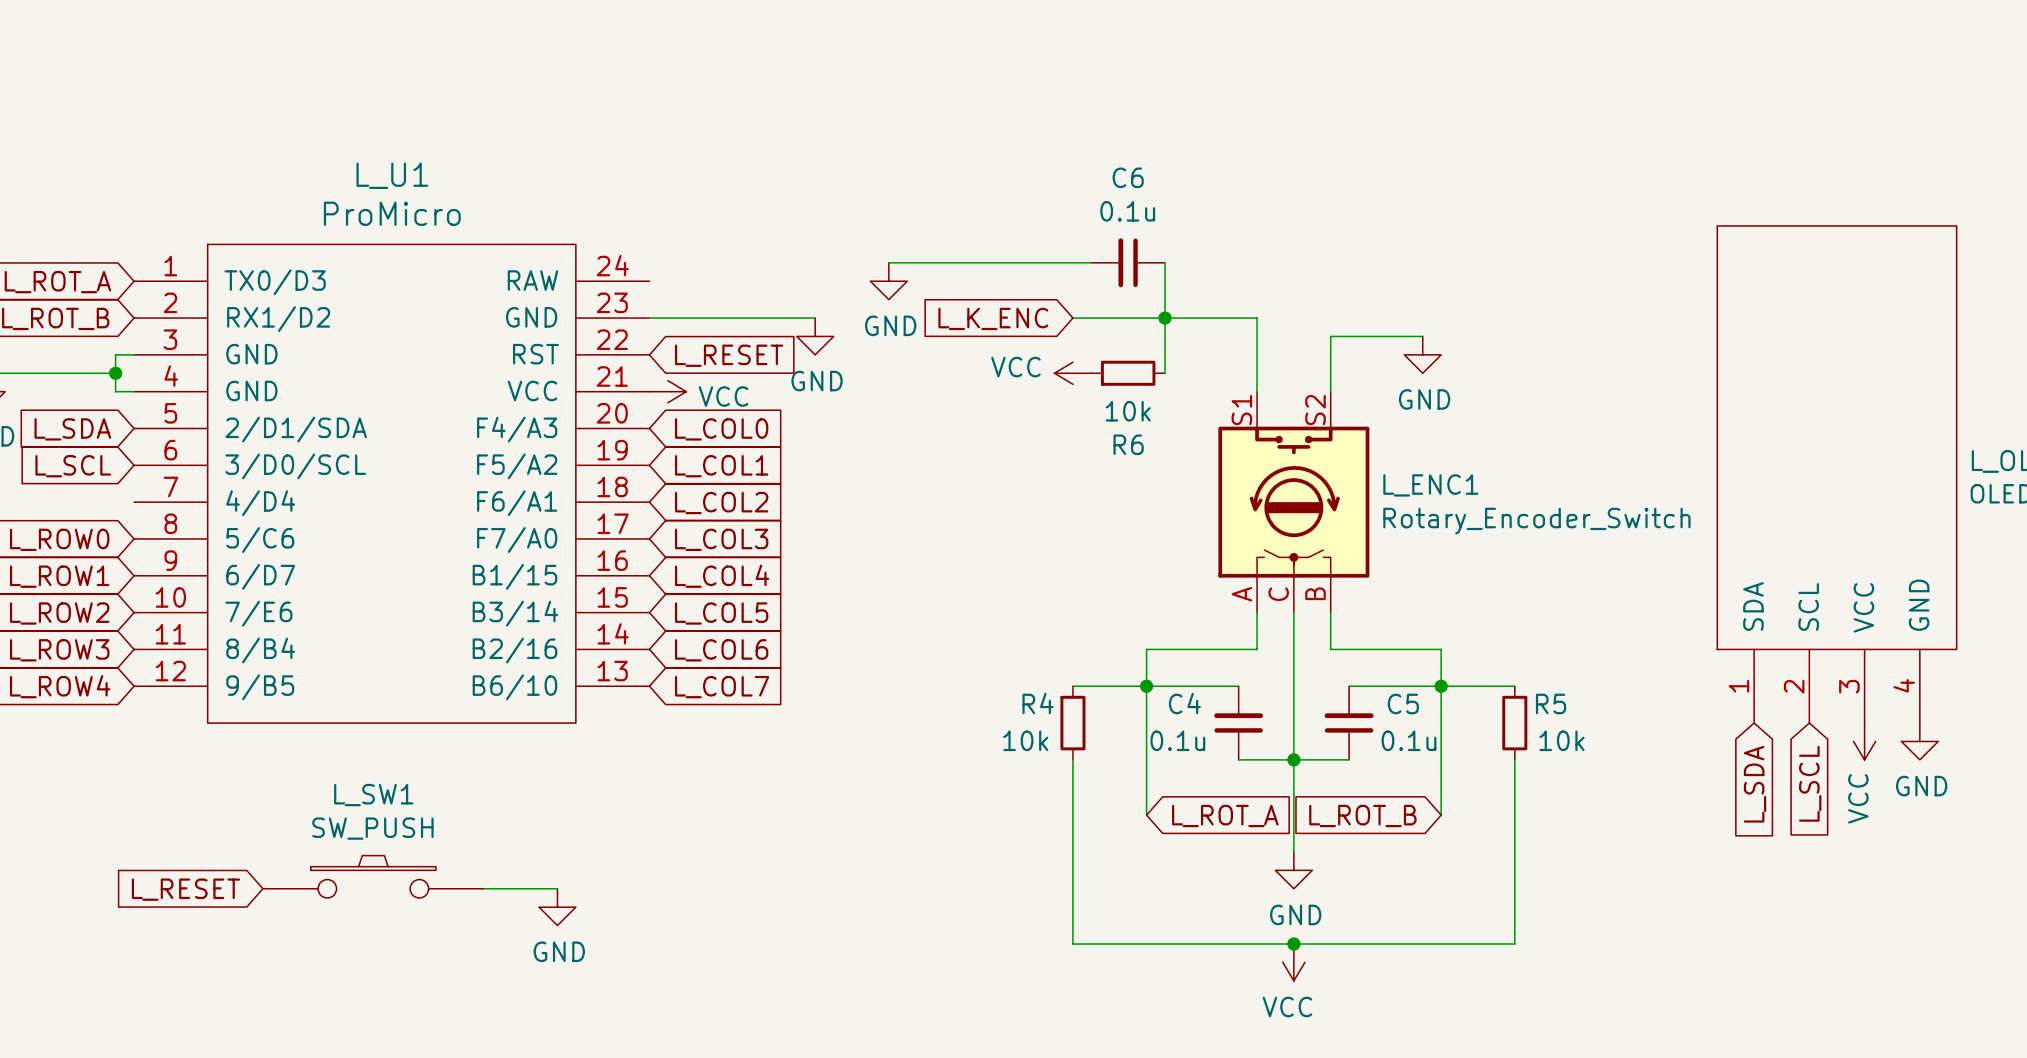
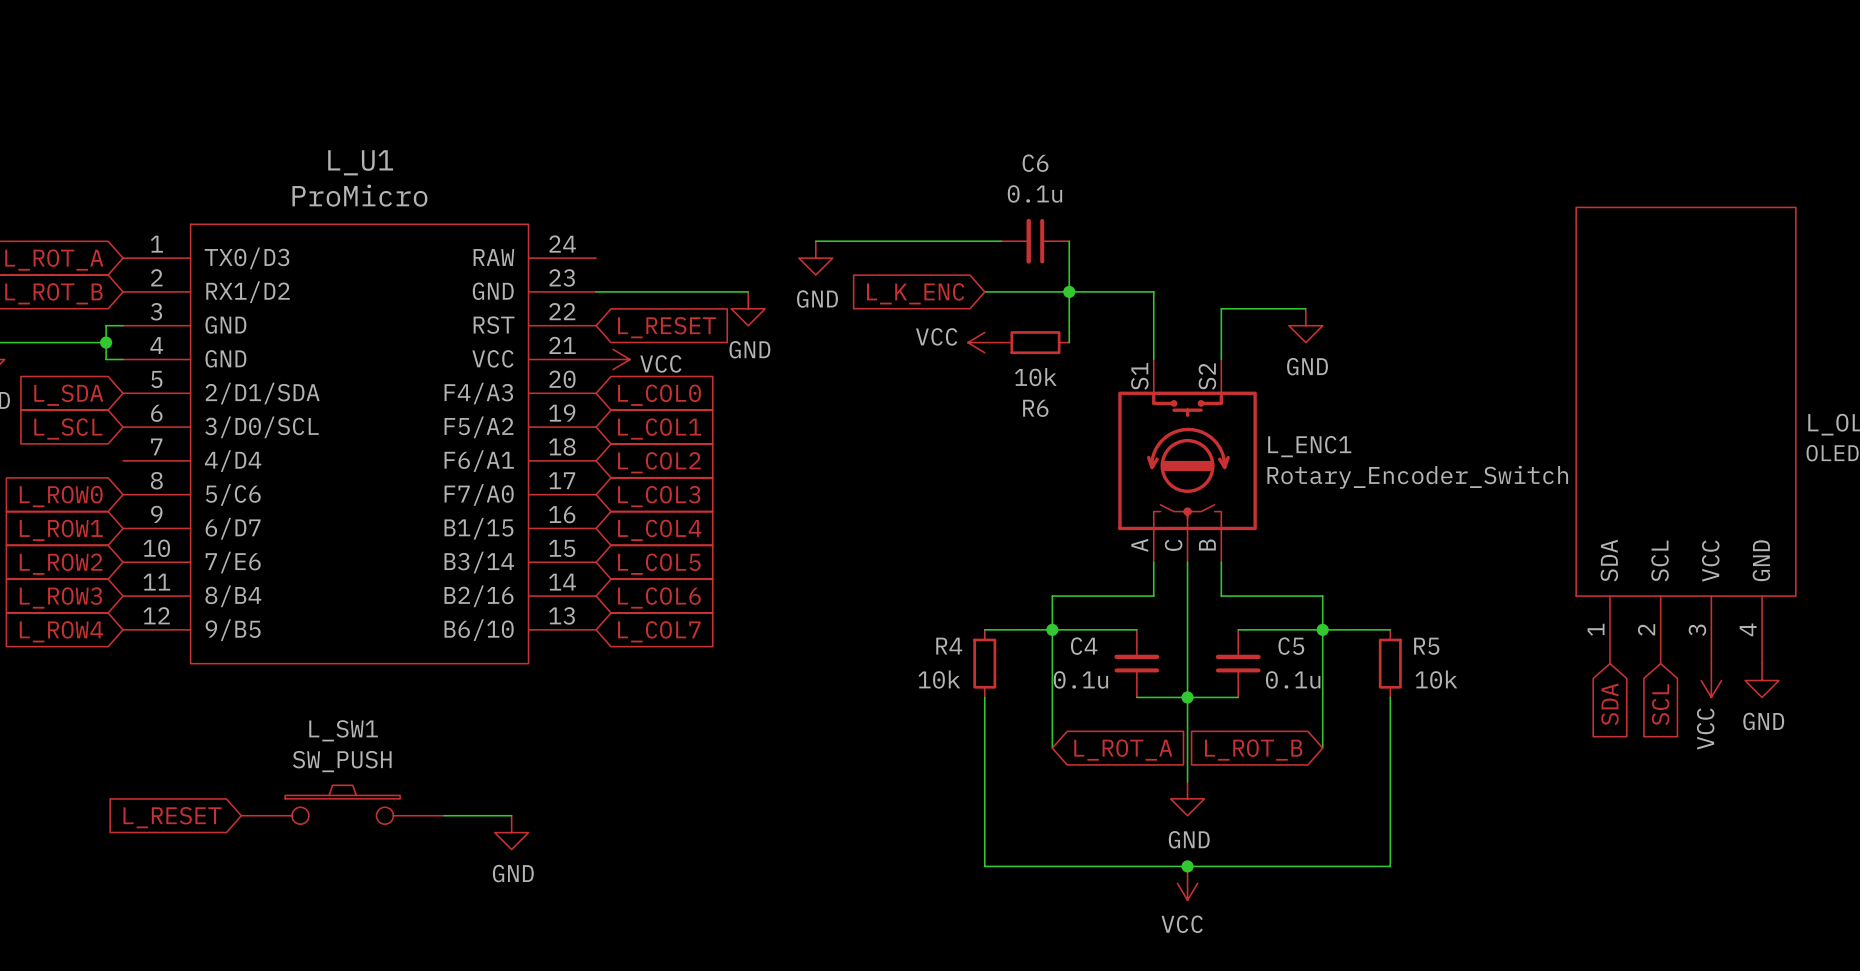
global label: L_SCL (1810, 783) -> SCL (1660, 704)
global label: L_SDA (1755, 784) -> SDA (1609, 704)

